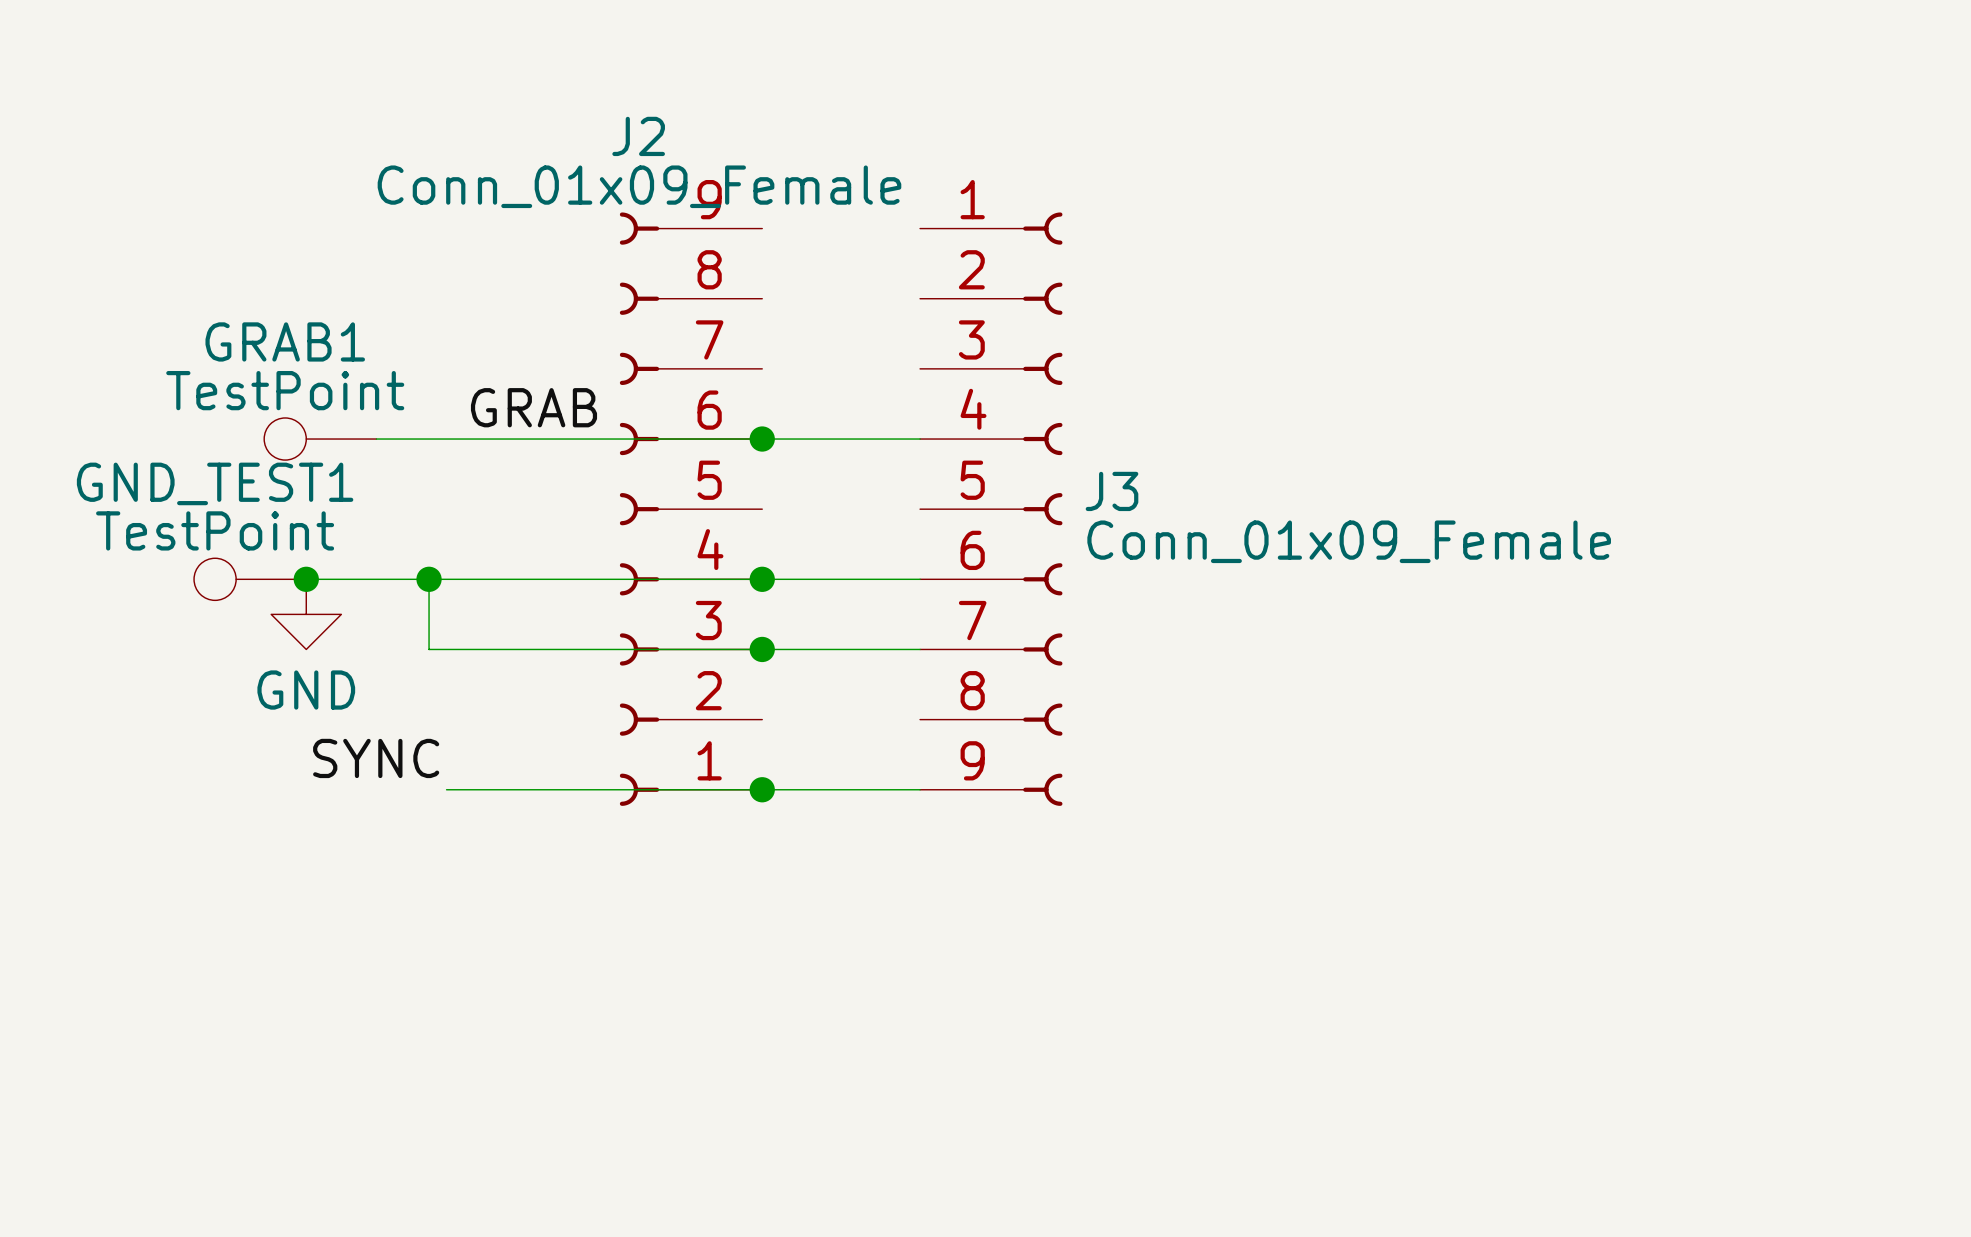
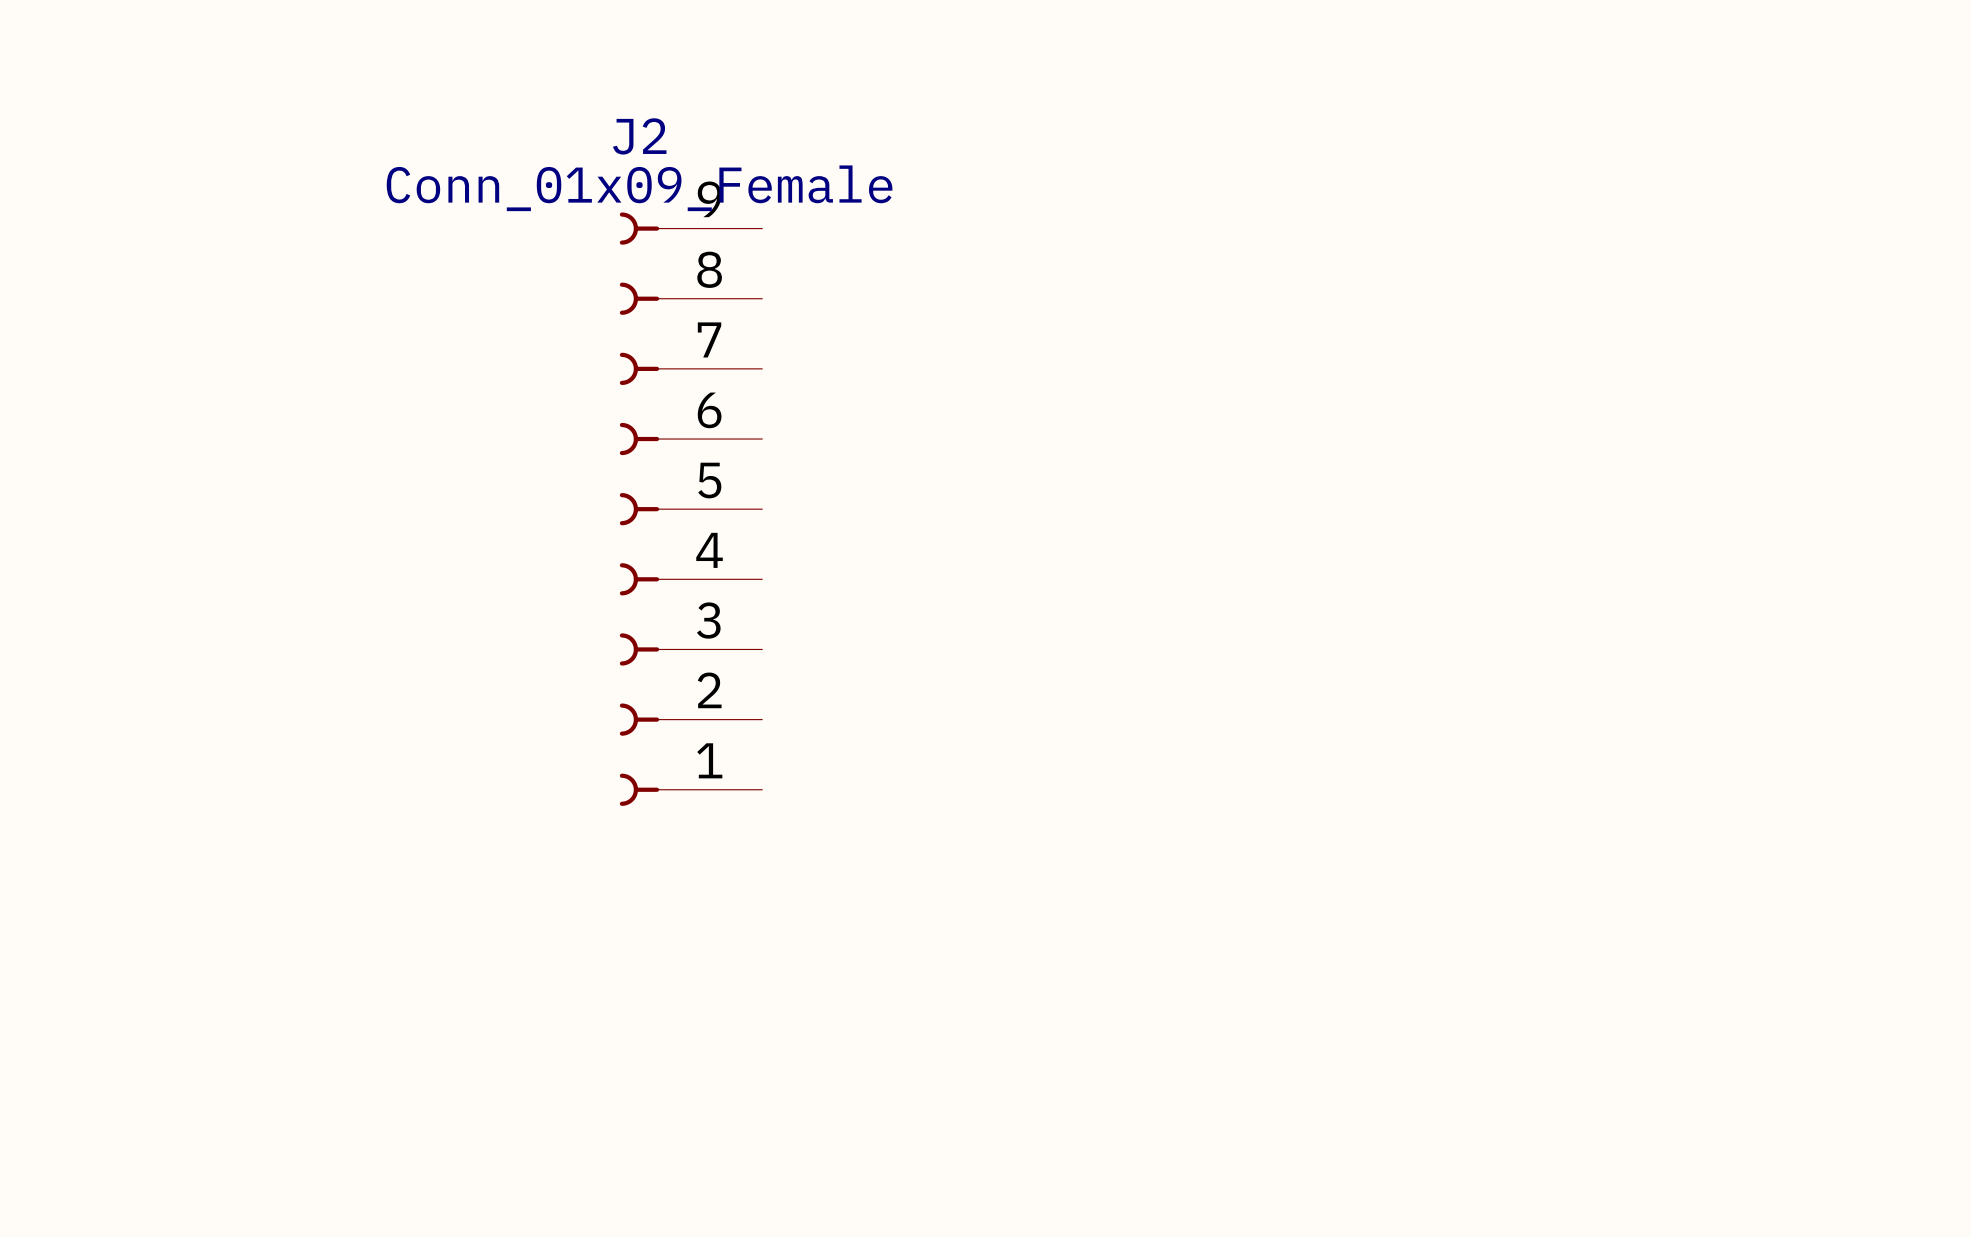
label: GRAB (533, 407) -> none
GRAB1: TestPoint (320, 439) -> none
wire: (376, 439) (920, 439) -> none
junction: (762, 439) -> none
J3: Conn_01x09_Female (991, 509) -> none
GND_TEST1: TestPoint (250, 579) -> none
wire: (306, 579) (920, 579) -> none
junction: (306, 579) -> none
wire: (429, 579) (429, 649) (920, 649) -> none
junction: (429, 579) -> none
junction: (762, 579) -> none
power symbol: GND (306, 614) -> none
junction: (762, 649) -> none
label: SYNC (376, 758) -> none
wire: (446, 789) (920, 789) -> none
junction: (762, 789) -> none

